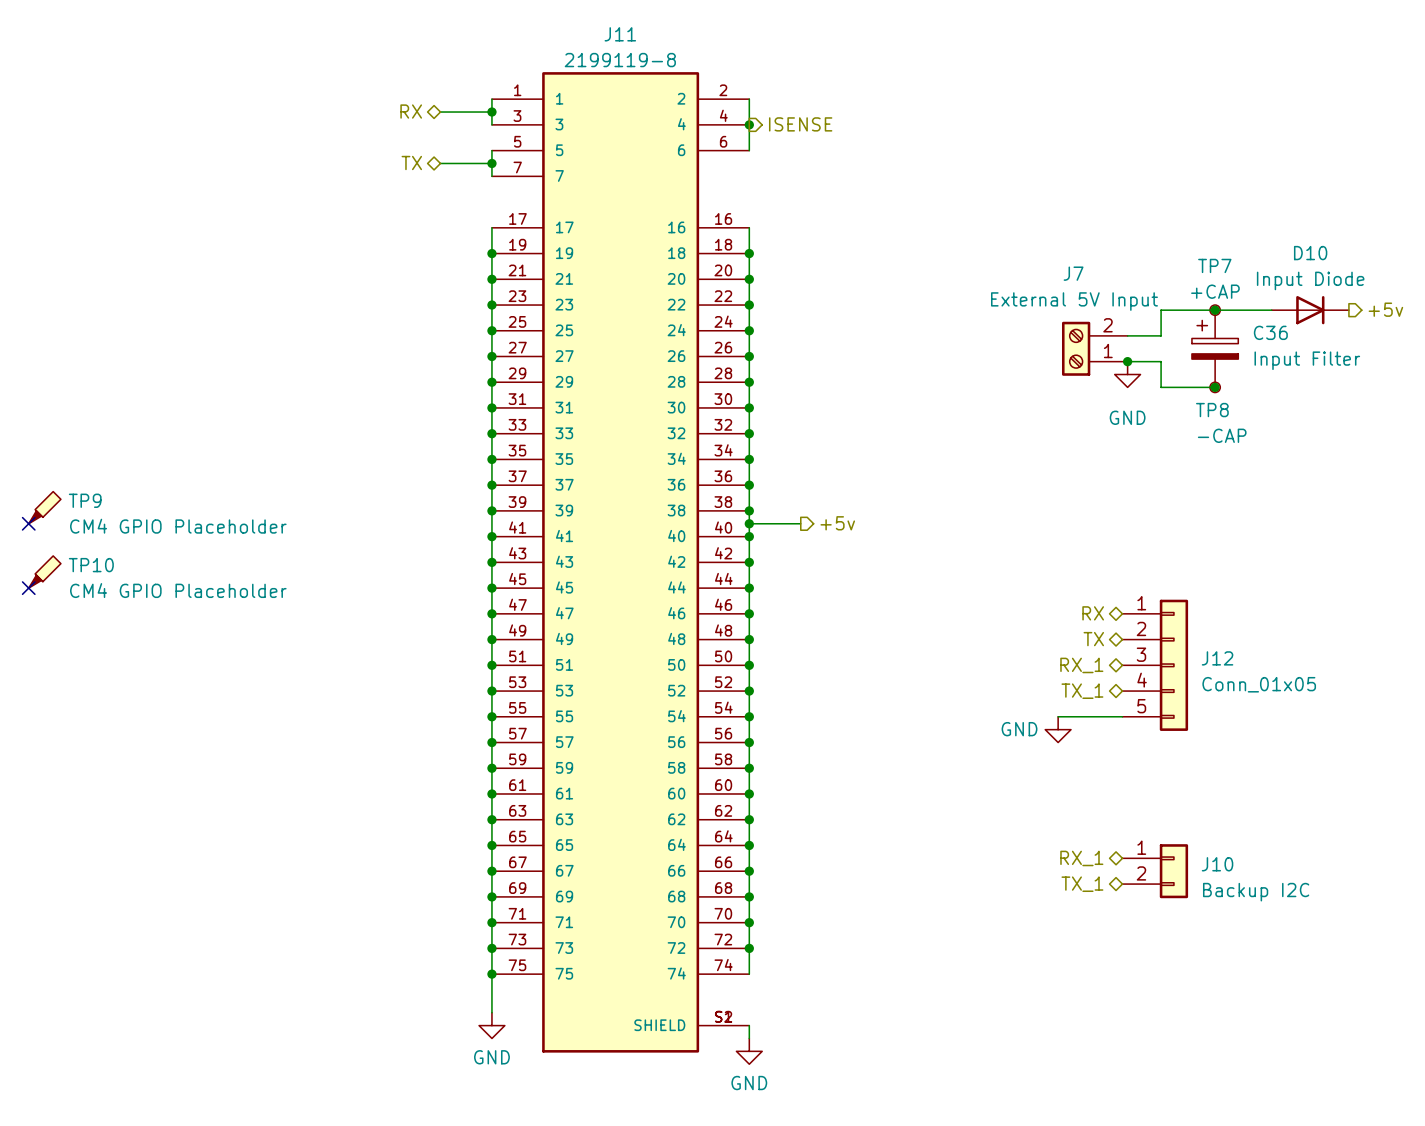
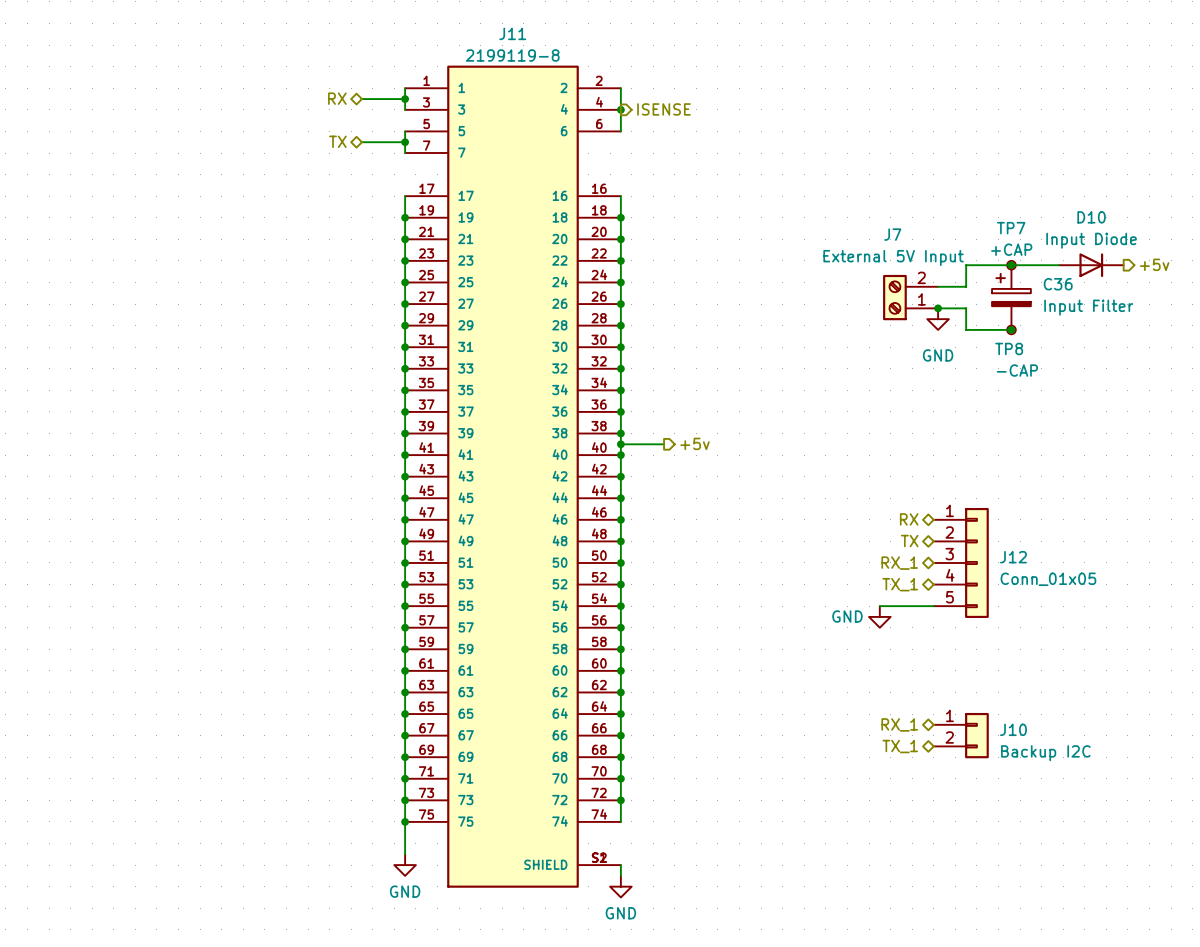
TP9: CM4 GPIO Placeholder (44, 507) -> none
no-connect mark: (28, 523) -> none
TP10: CM4 GPIO Placeholder (44, 572) -> none
no-connect mark: (28, 588) -> none

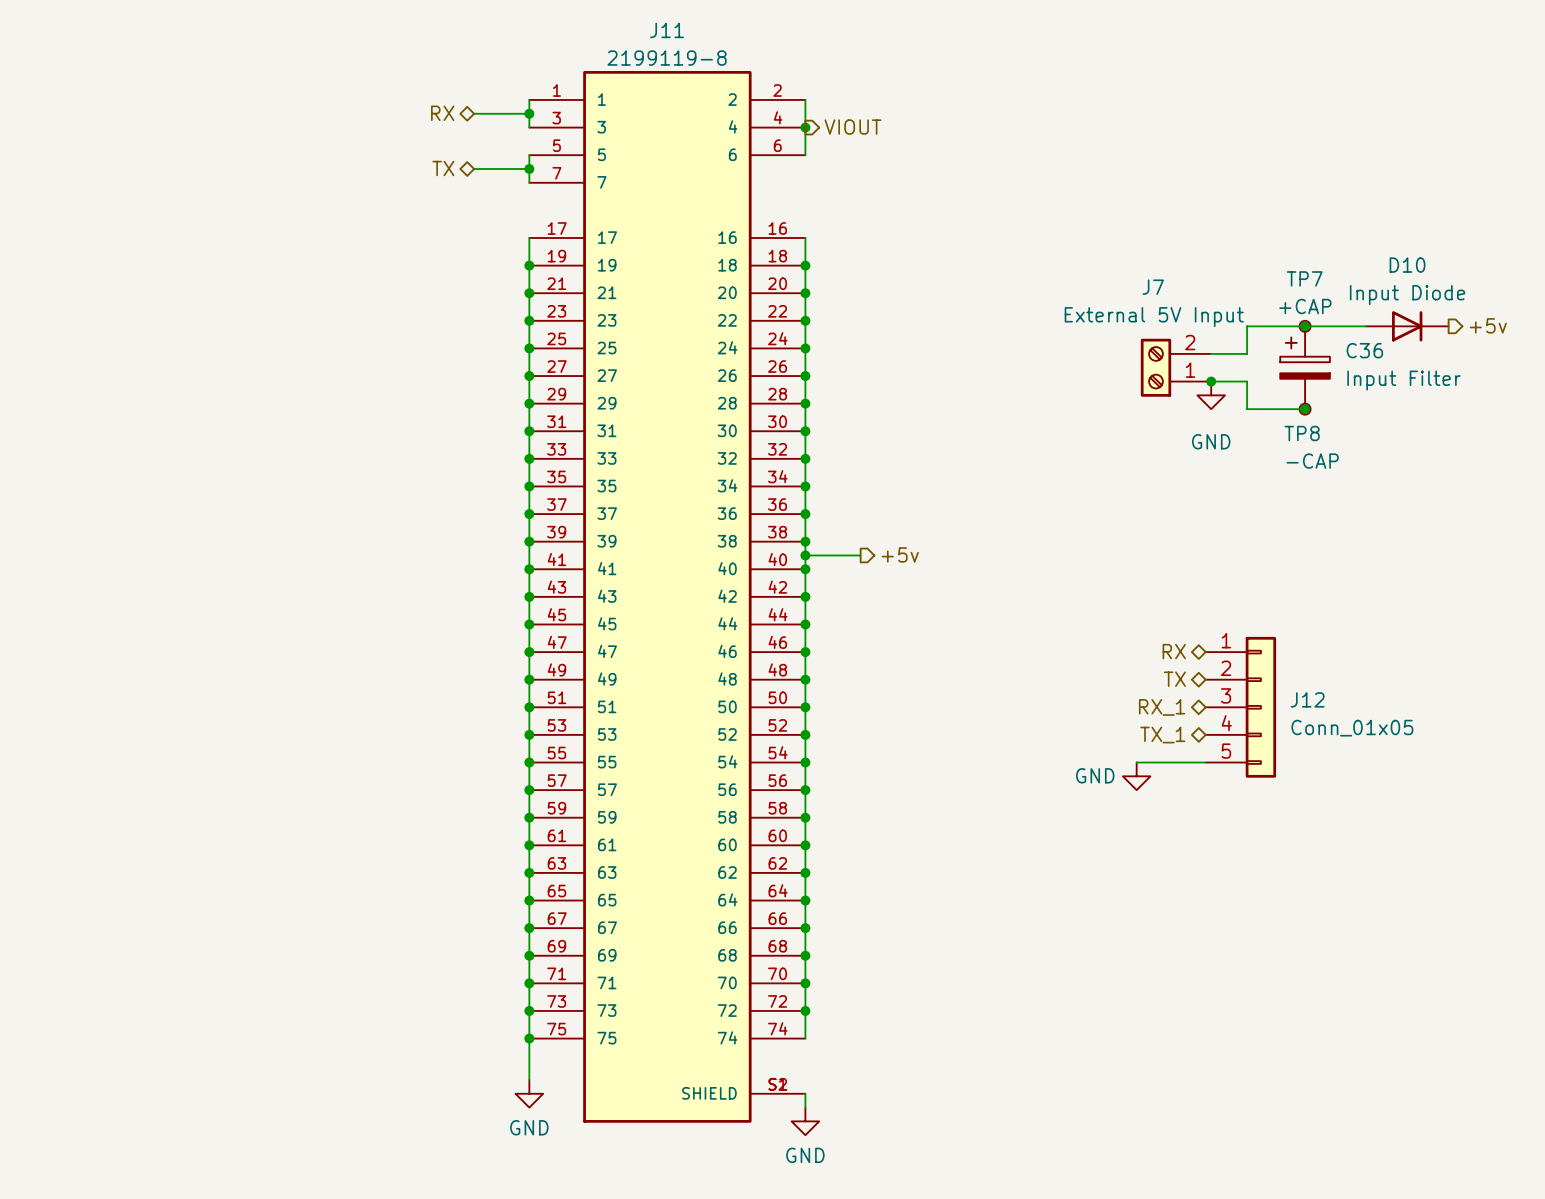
hierarchical label: ISENSE (663, 109) -> VIOUT (852, 127)
hierarchical label: RX_1 (899, 724) -> none
J10: Backup I2C (961, 735) -> none
hierarchical label: TX_1 (900, 746) -> none

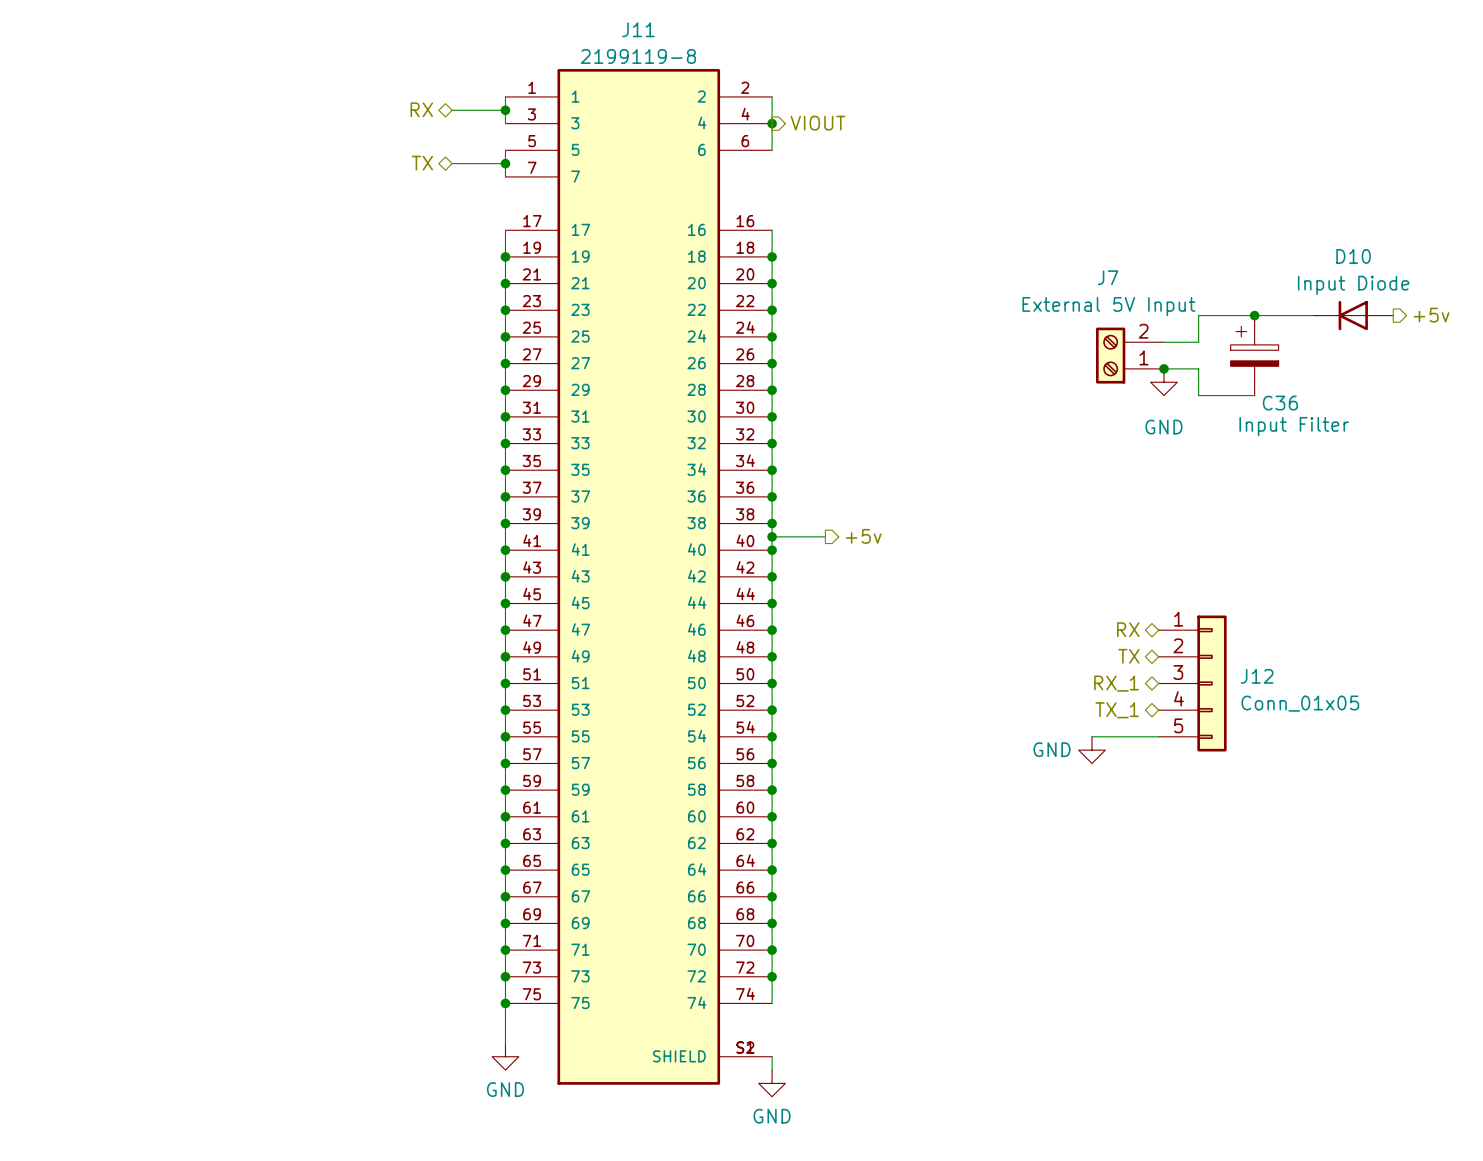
TP7: +CAP (1305, 326) -> none
D10 rotation: 0° (1407, 326) -> 180° (1353, 315)
C36 name position: C36 (1364, 350) -> C36 (1280, 403)
C36 value position: Input Filter (1403, 380) -> Input Filter (1294, 426)
junction: (1305, 409) -> none
TP8: -CAP (1305, 409) -> none

